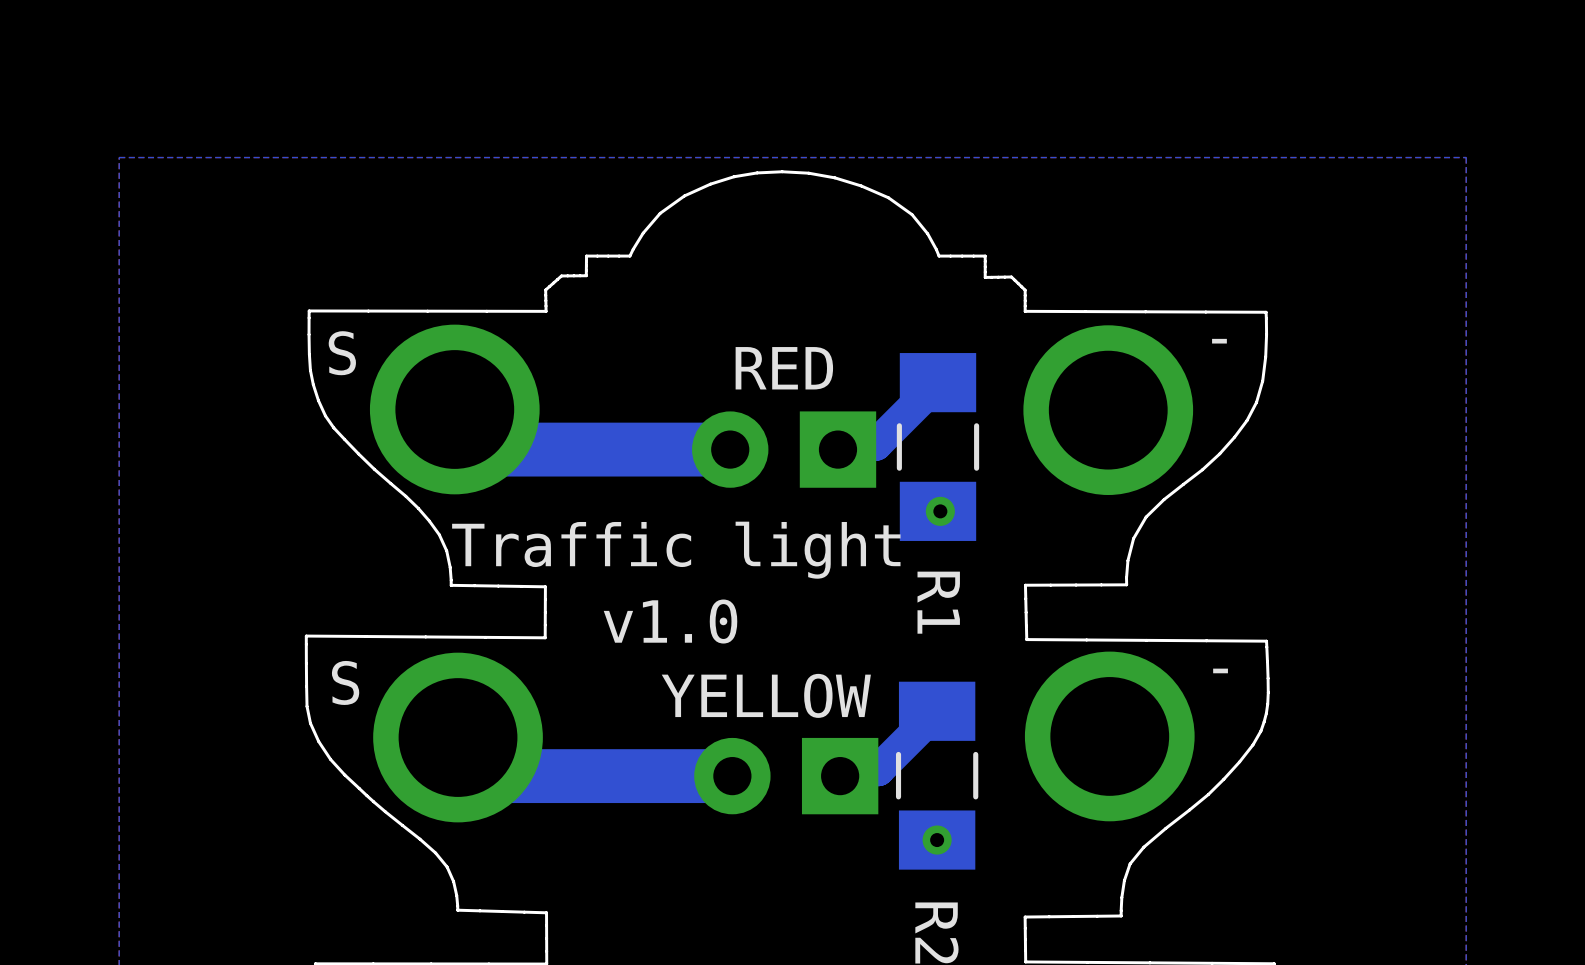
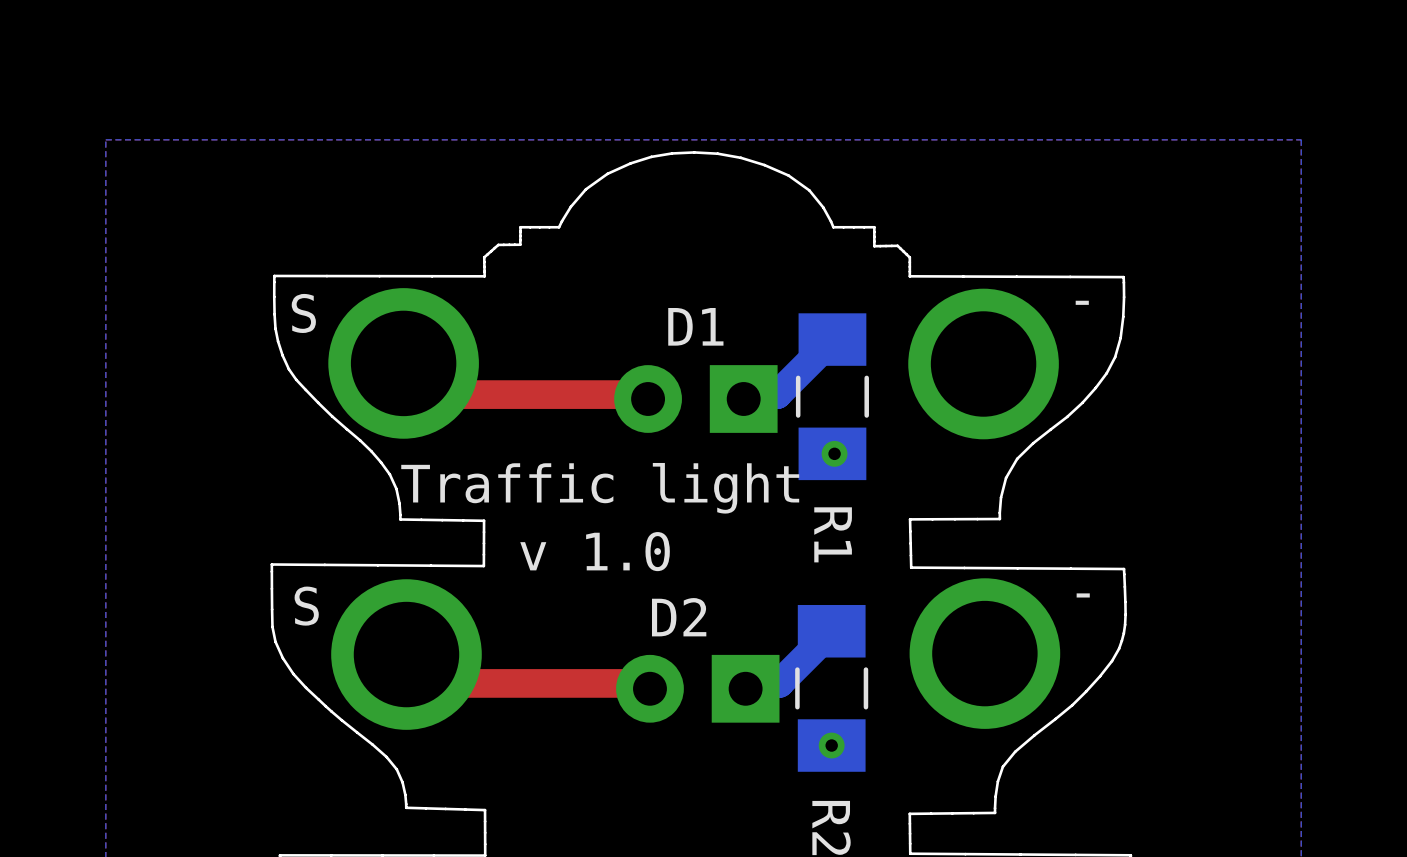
RED name: RED (784, 368) -> D1 (695, 326)
bottom track: (454, 409) (494, 449) (730, 449) -> none
top track: none -> (646, 394) (434, 394)
text: v1.0 (670, 621) -> v 1.0 (595, 551)
YELLOW name: YELLOW (766, 695) -> D2 (679, 617)
bottom track: (458, 737) (496, 776) (732, 776) -> none
top track: none -> (644, 683) (435, 683)

